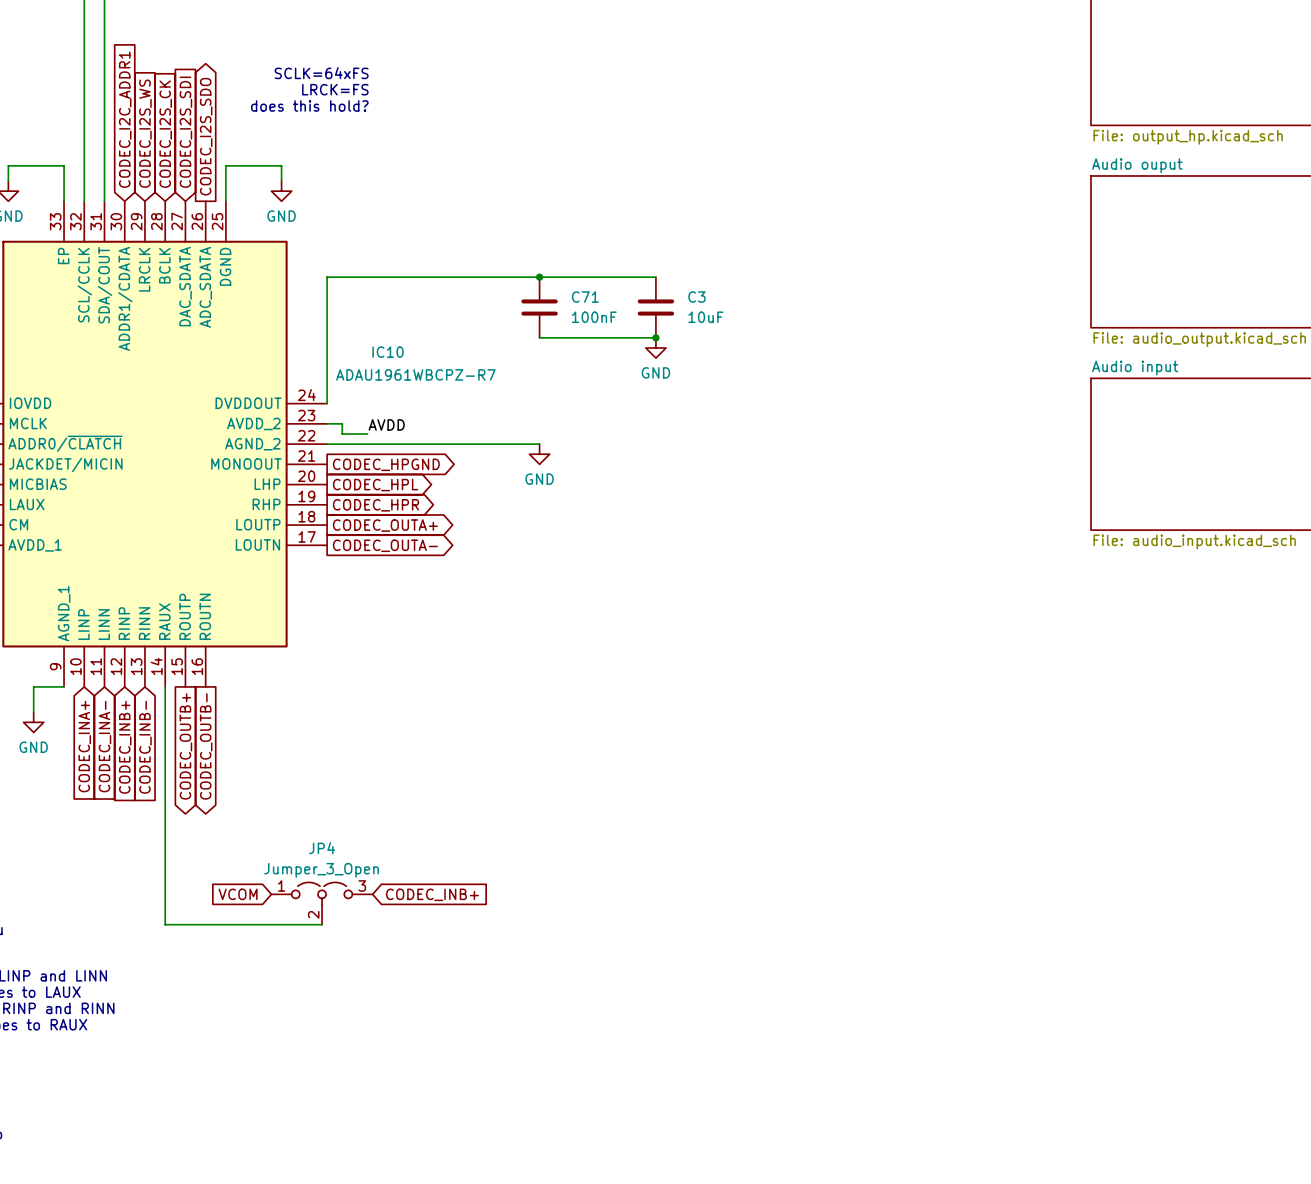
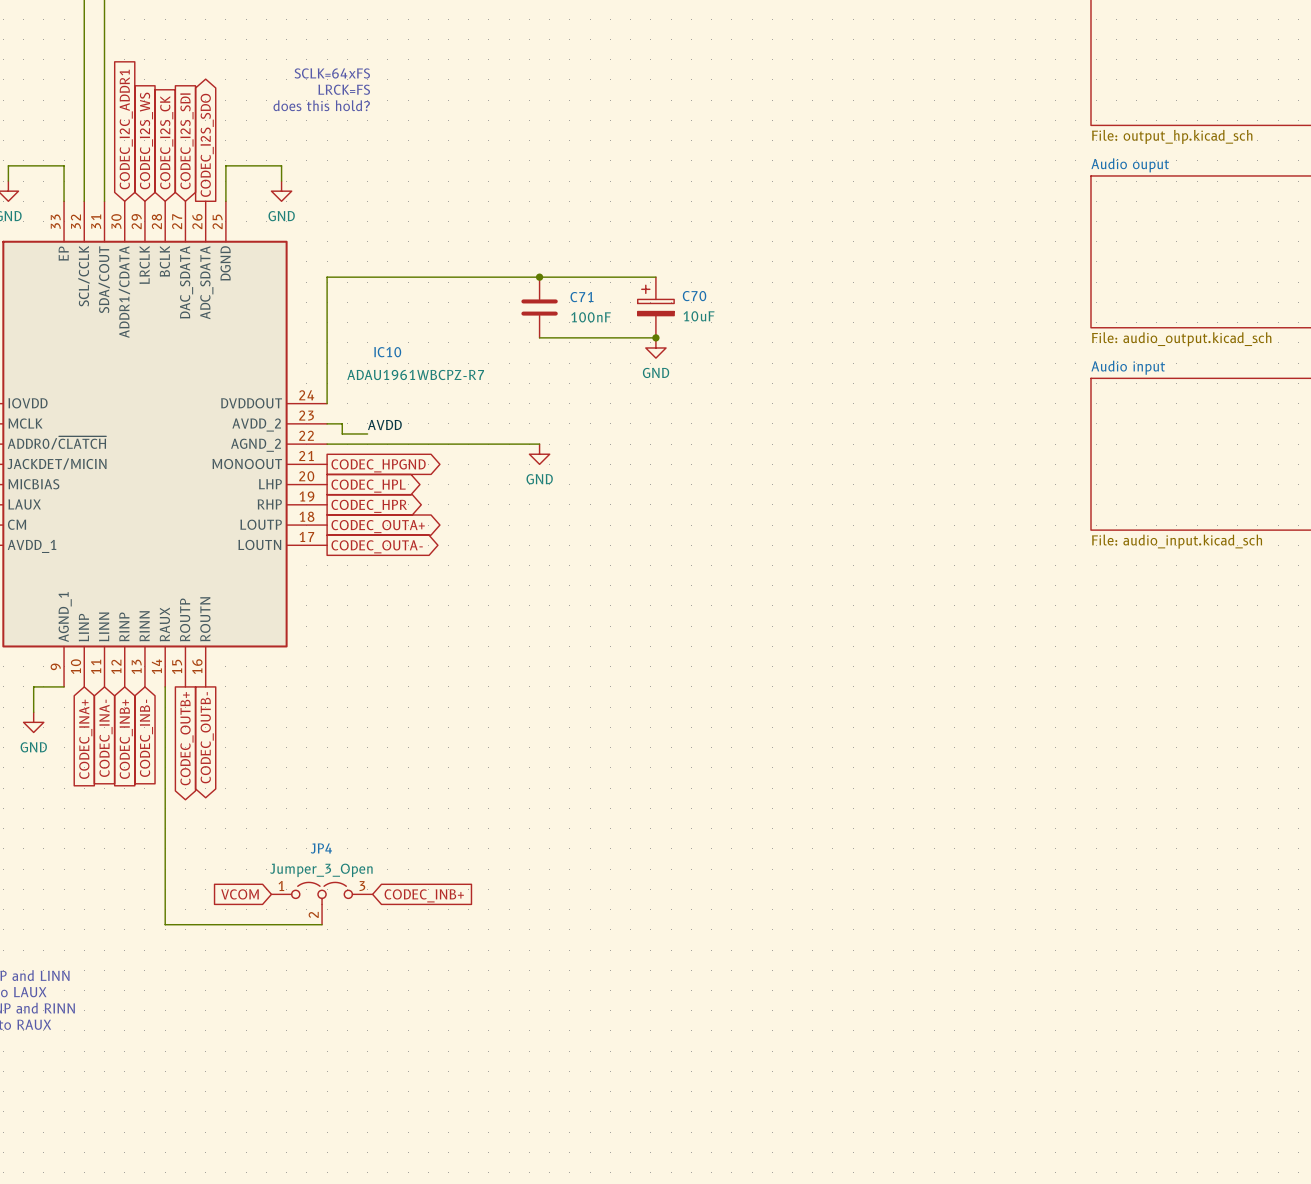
C3: 10uF (655, 307) -> none
C70: none -> 10uF (655, 307)

